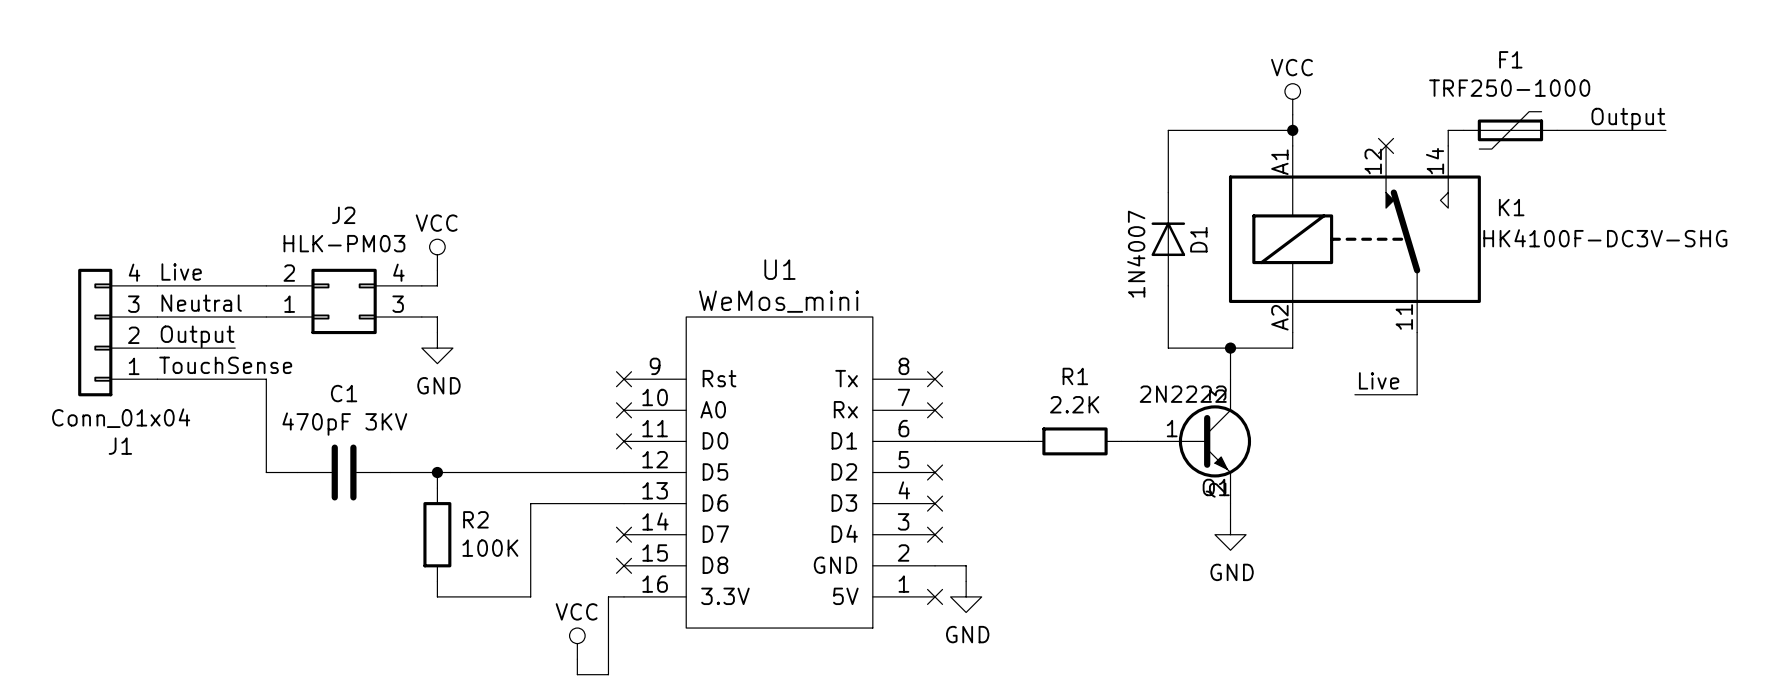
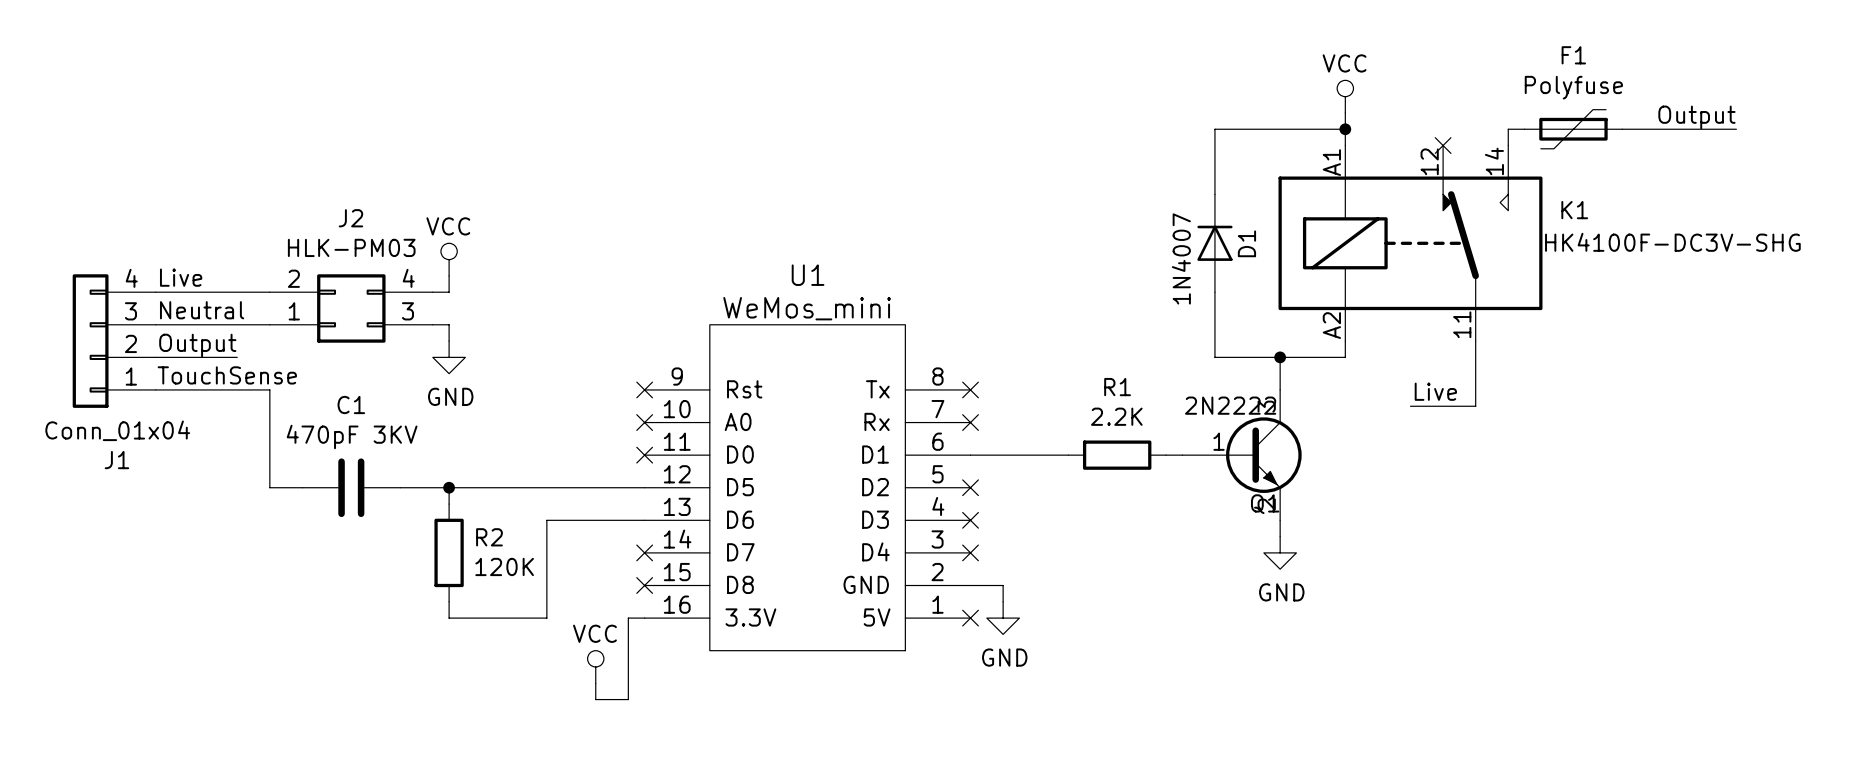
F1 value: TRF250-1000 (1509, 88) -> Polyfuse (1573, 87)
R2 value: 100K (490, 548) -> 120K (504, 566)

